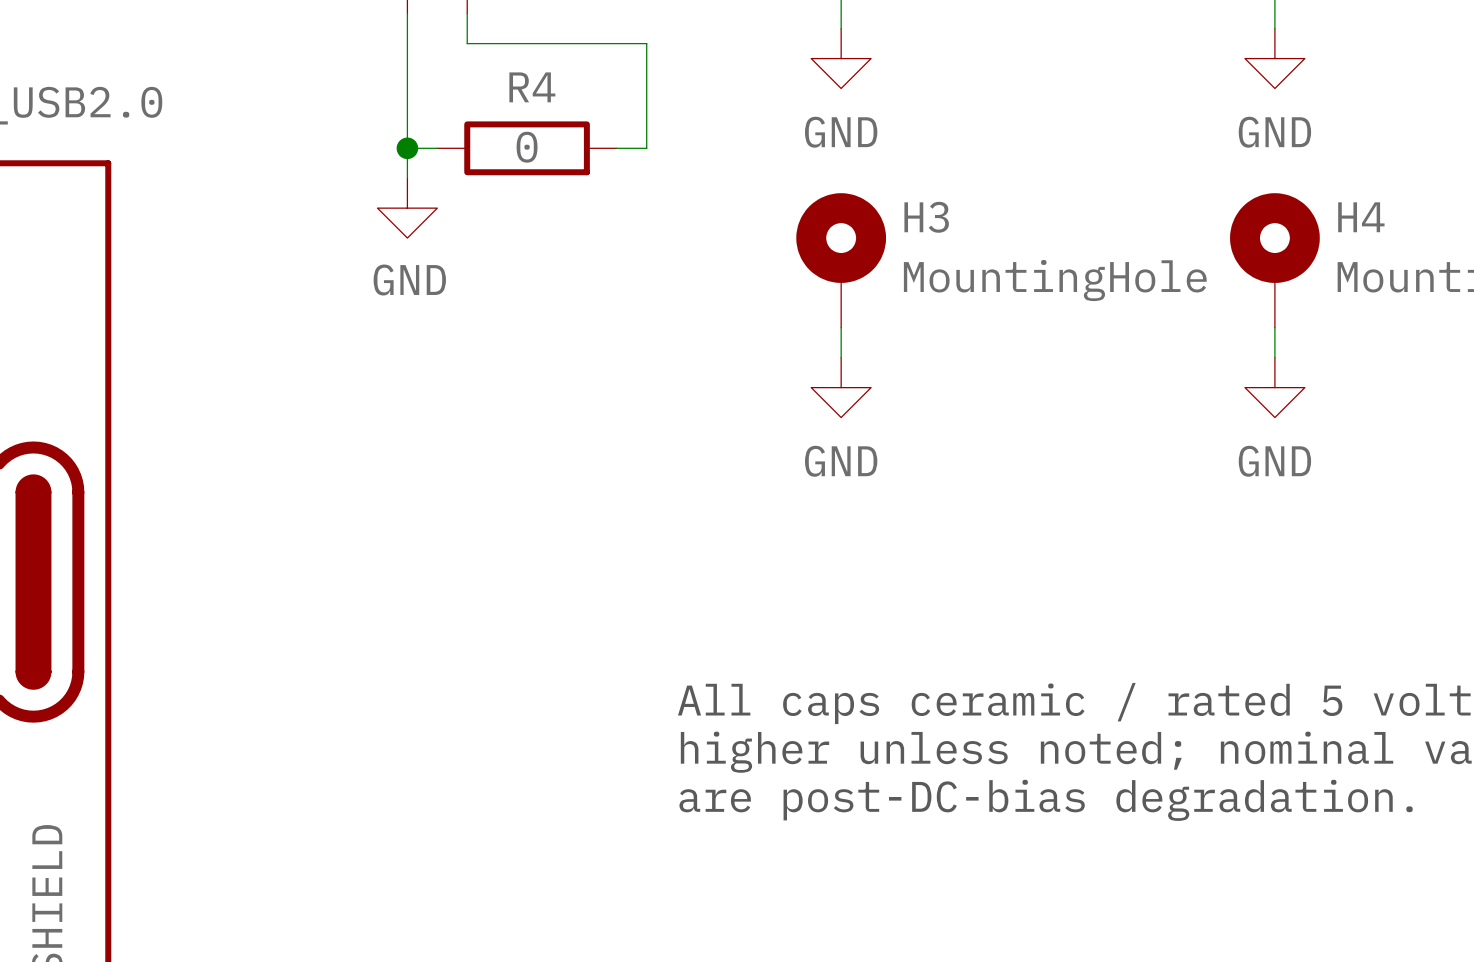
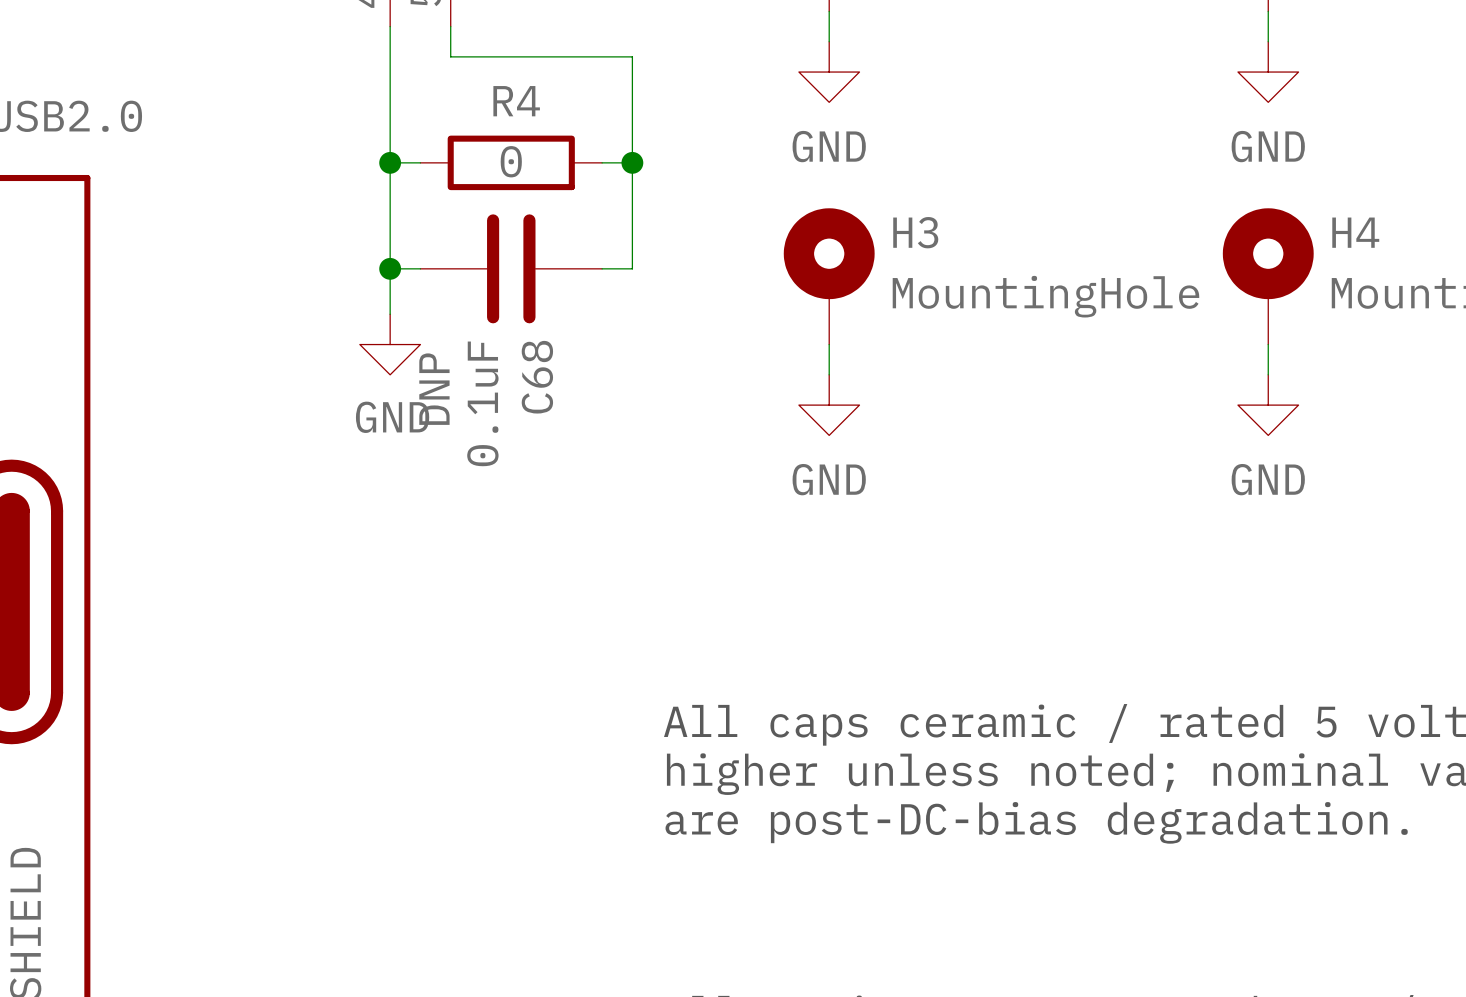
wire: none -> (632, 162) (632, 268) (602, 268)
junction: none -> (632, 162)
wire: none -> (390, 193) (390, 314)
power symbol position: GND (407, 208) -> GND (390, 344)
wire: none -> (390, 268) (420, 268)
junction: none -> (390, 268)
C68: none -> 0.1uF (511, 268)

